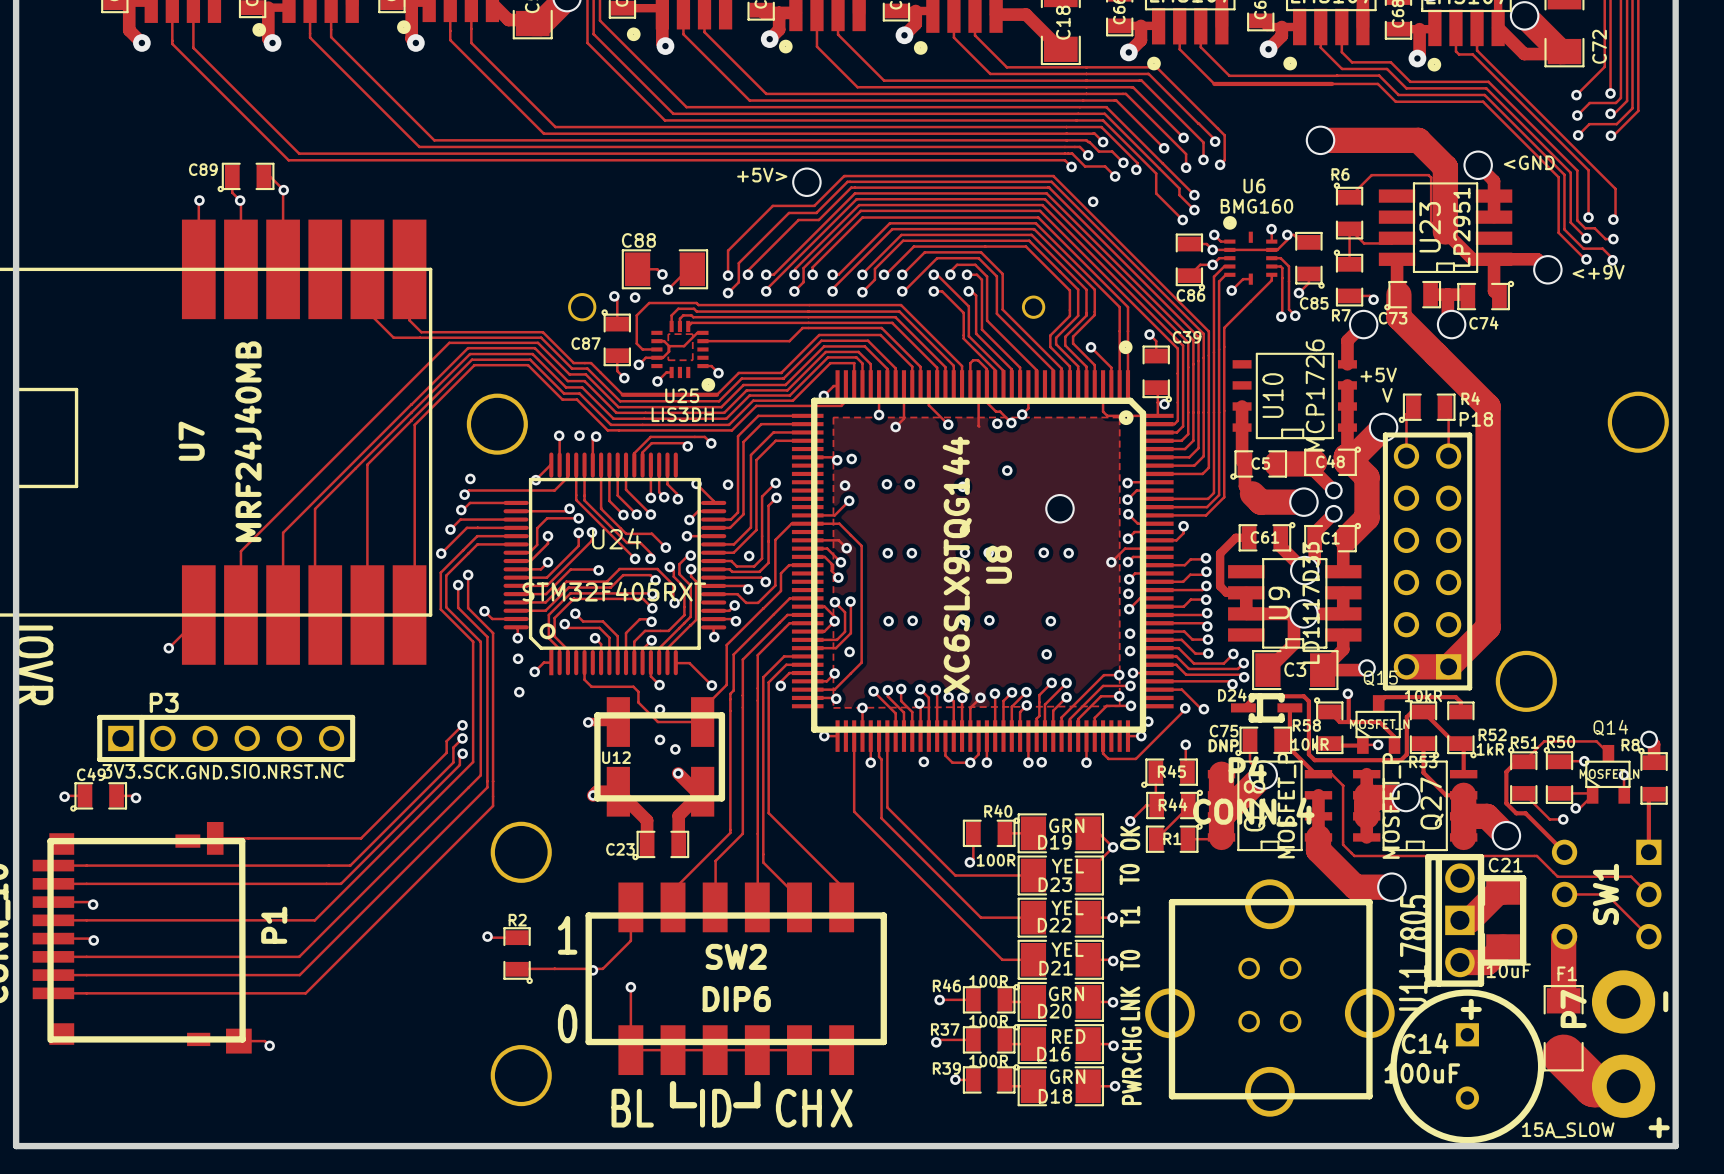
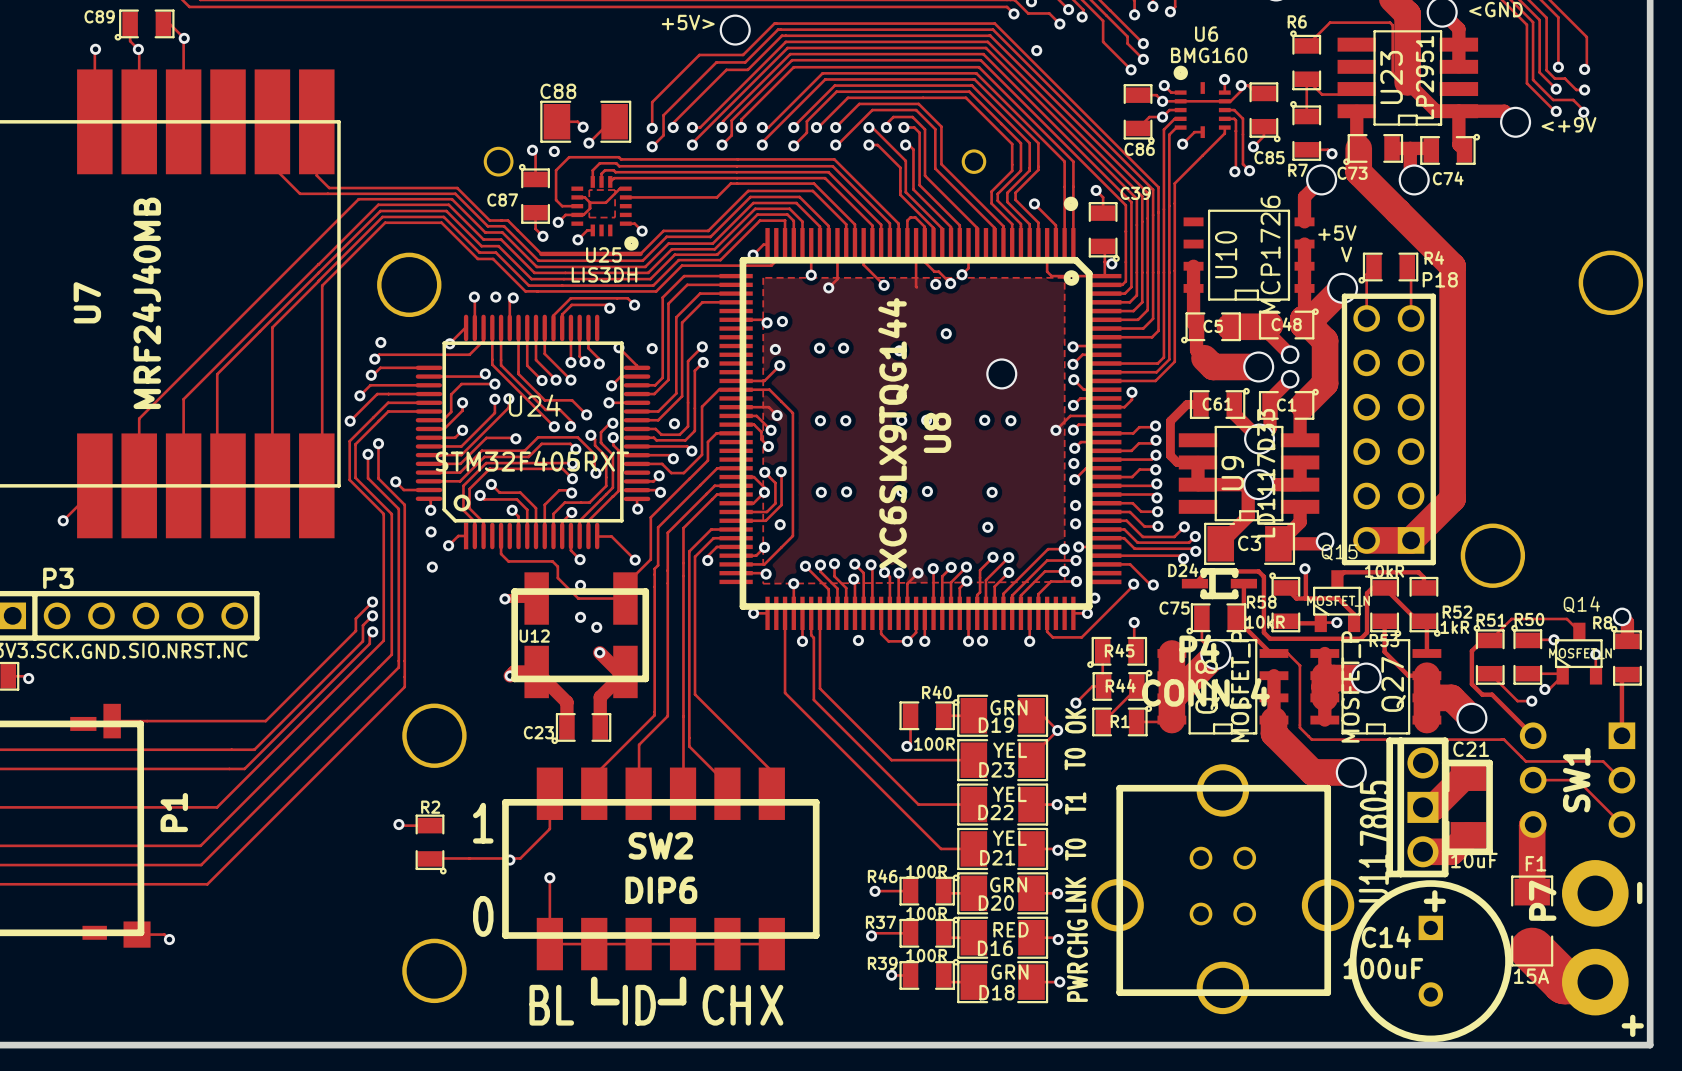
text: DNP (1223, 745) -> none
F1 value: 15A_SLOW (1568, 1130) -> 15A (1531, 976)

